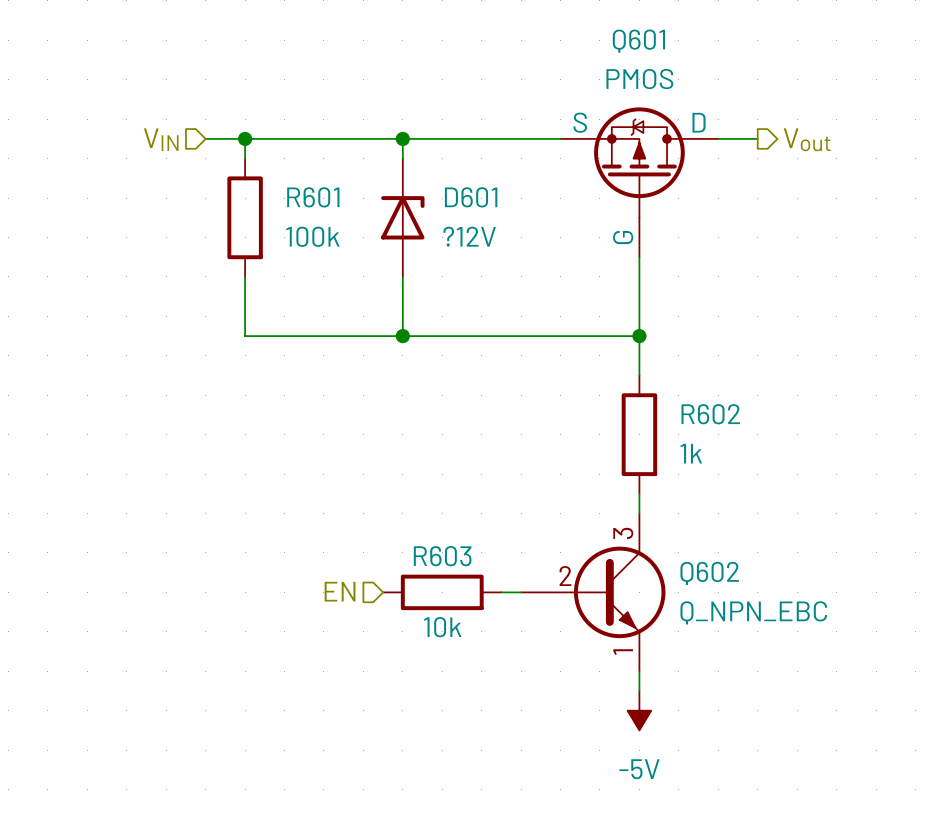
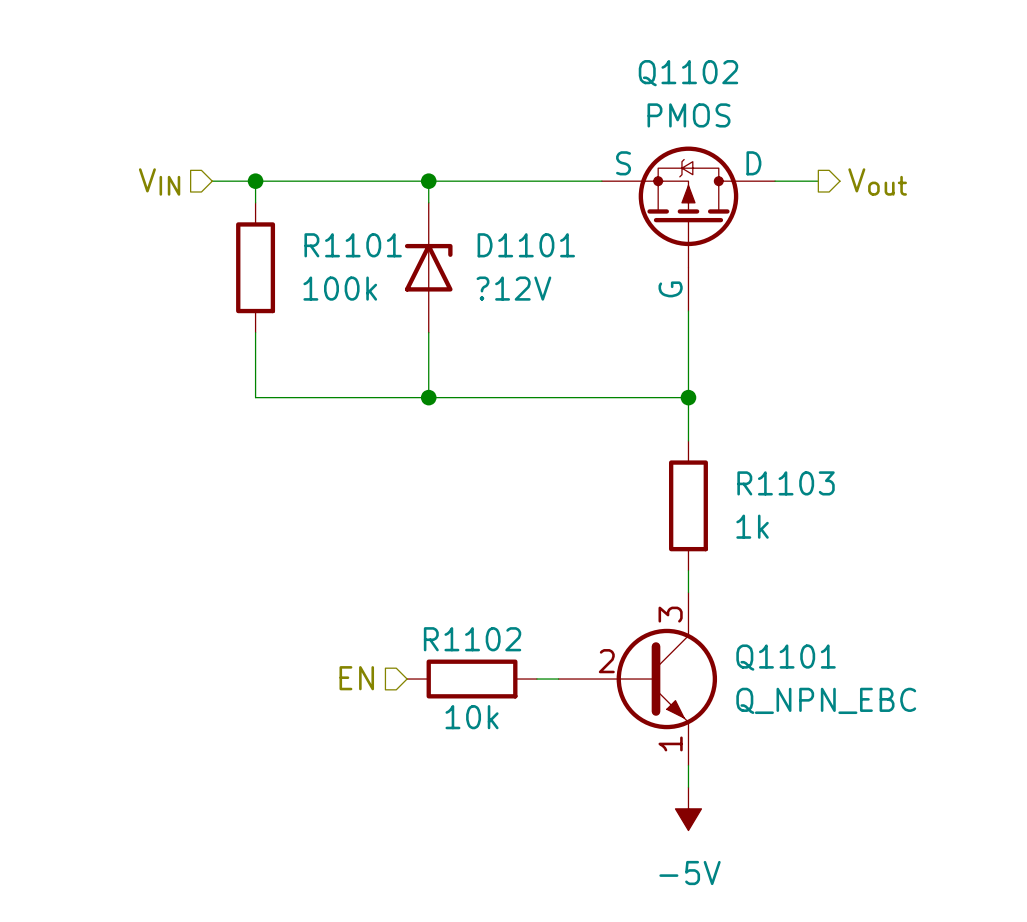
Q601 name: Q601 (638, 41) -> Q1102 (688, 73)
R601 name: R601 (313, 197) -> R1101 (353, 245)
D601 name: D601 (471, 197) -> D1101 (526, 245)
R602 name: R602 (710, 414) -> R1103 (786, 483)
R603 name: R603 (442, 556) -> R1102 (472, 639)
Q602 name: Q602 (709, 573) -> Q1101 (786, 657)

